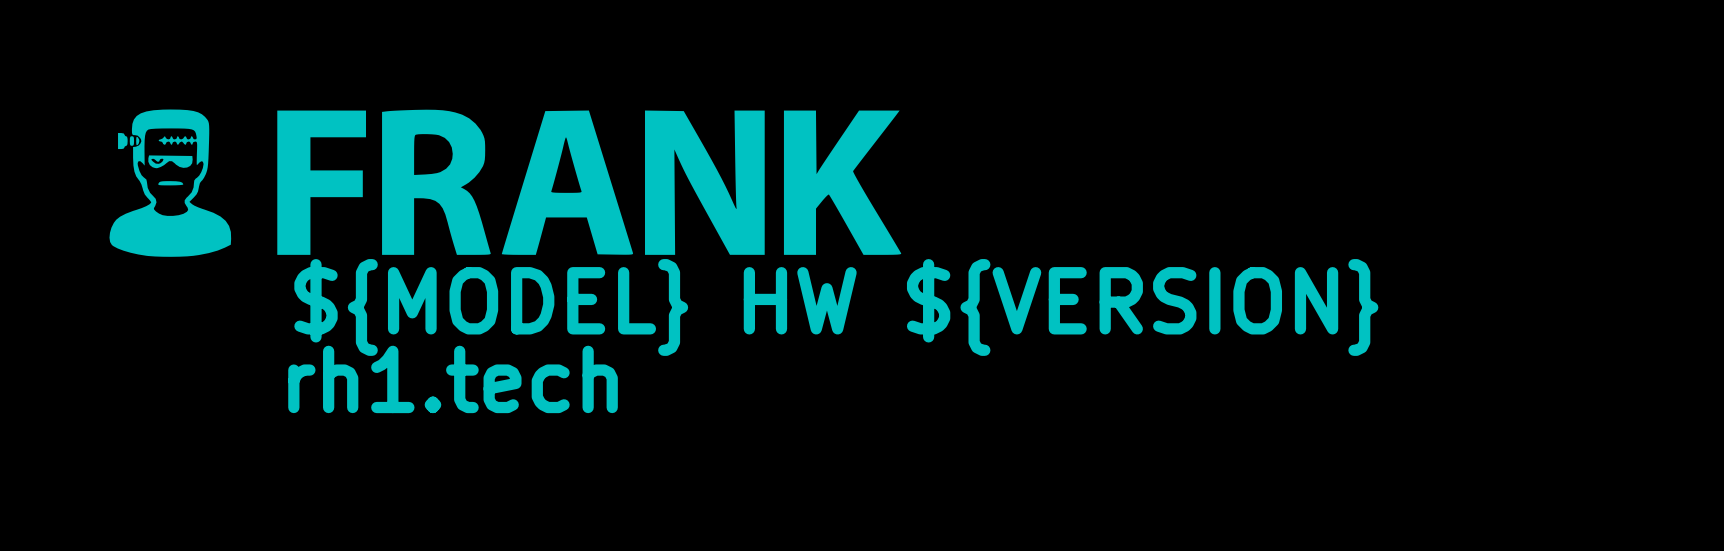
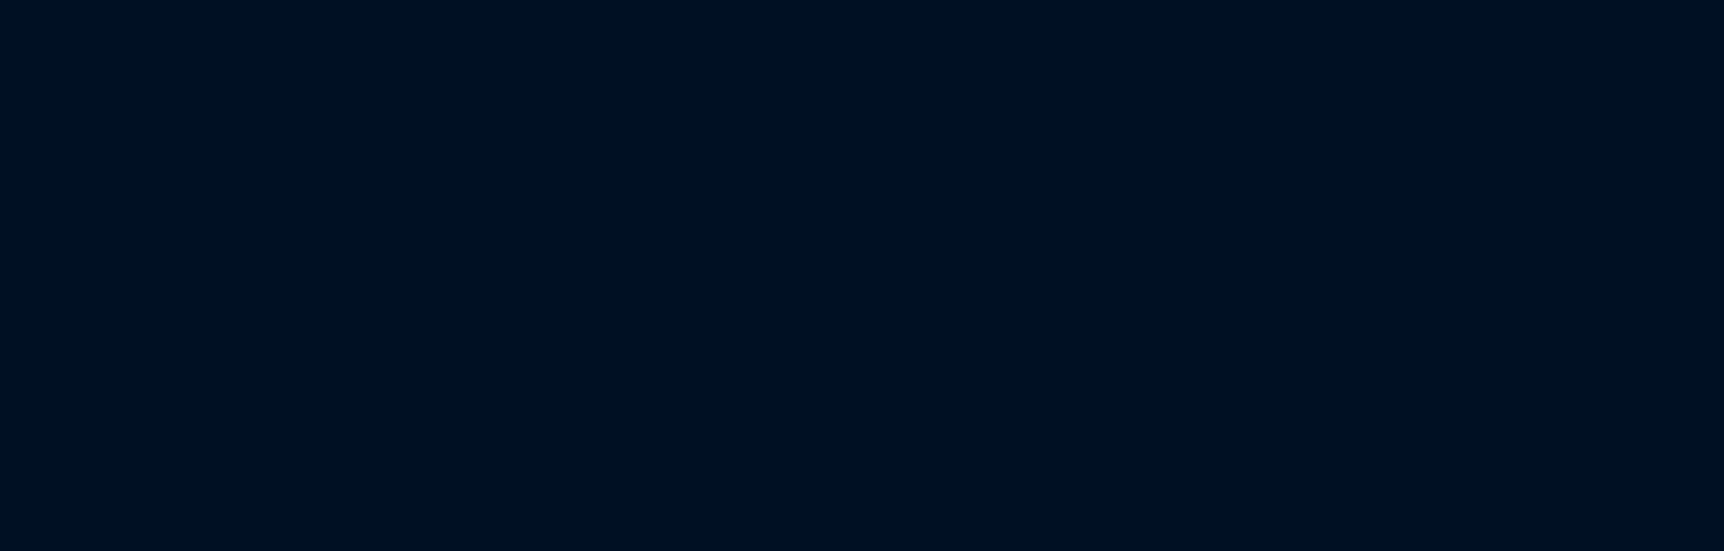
drawing: [109, 109, 902, 257] -> none
text: ${MODEL} HW ${VERSION} (836, 307) -> none
text: rh1.tech (453, 379) -> none

